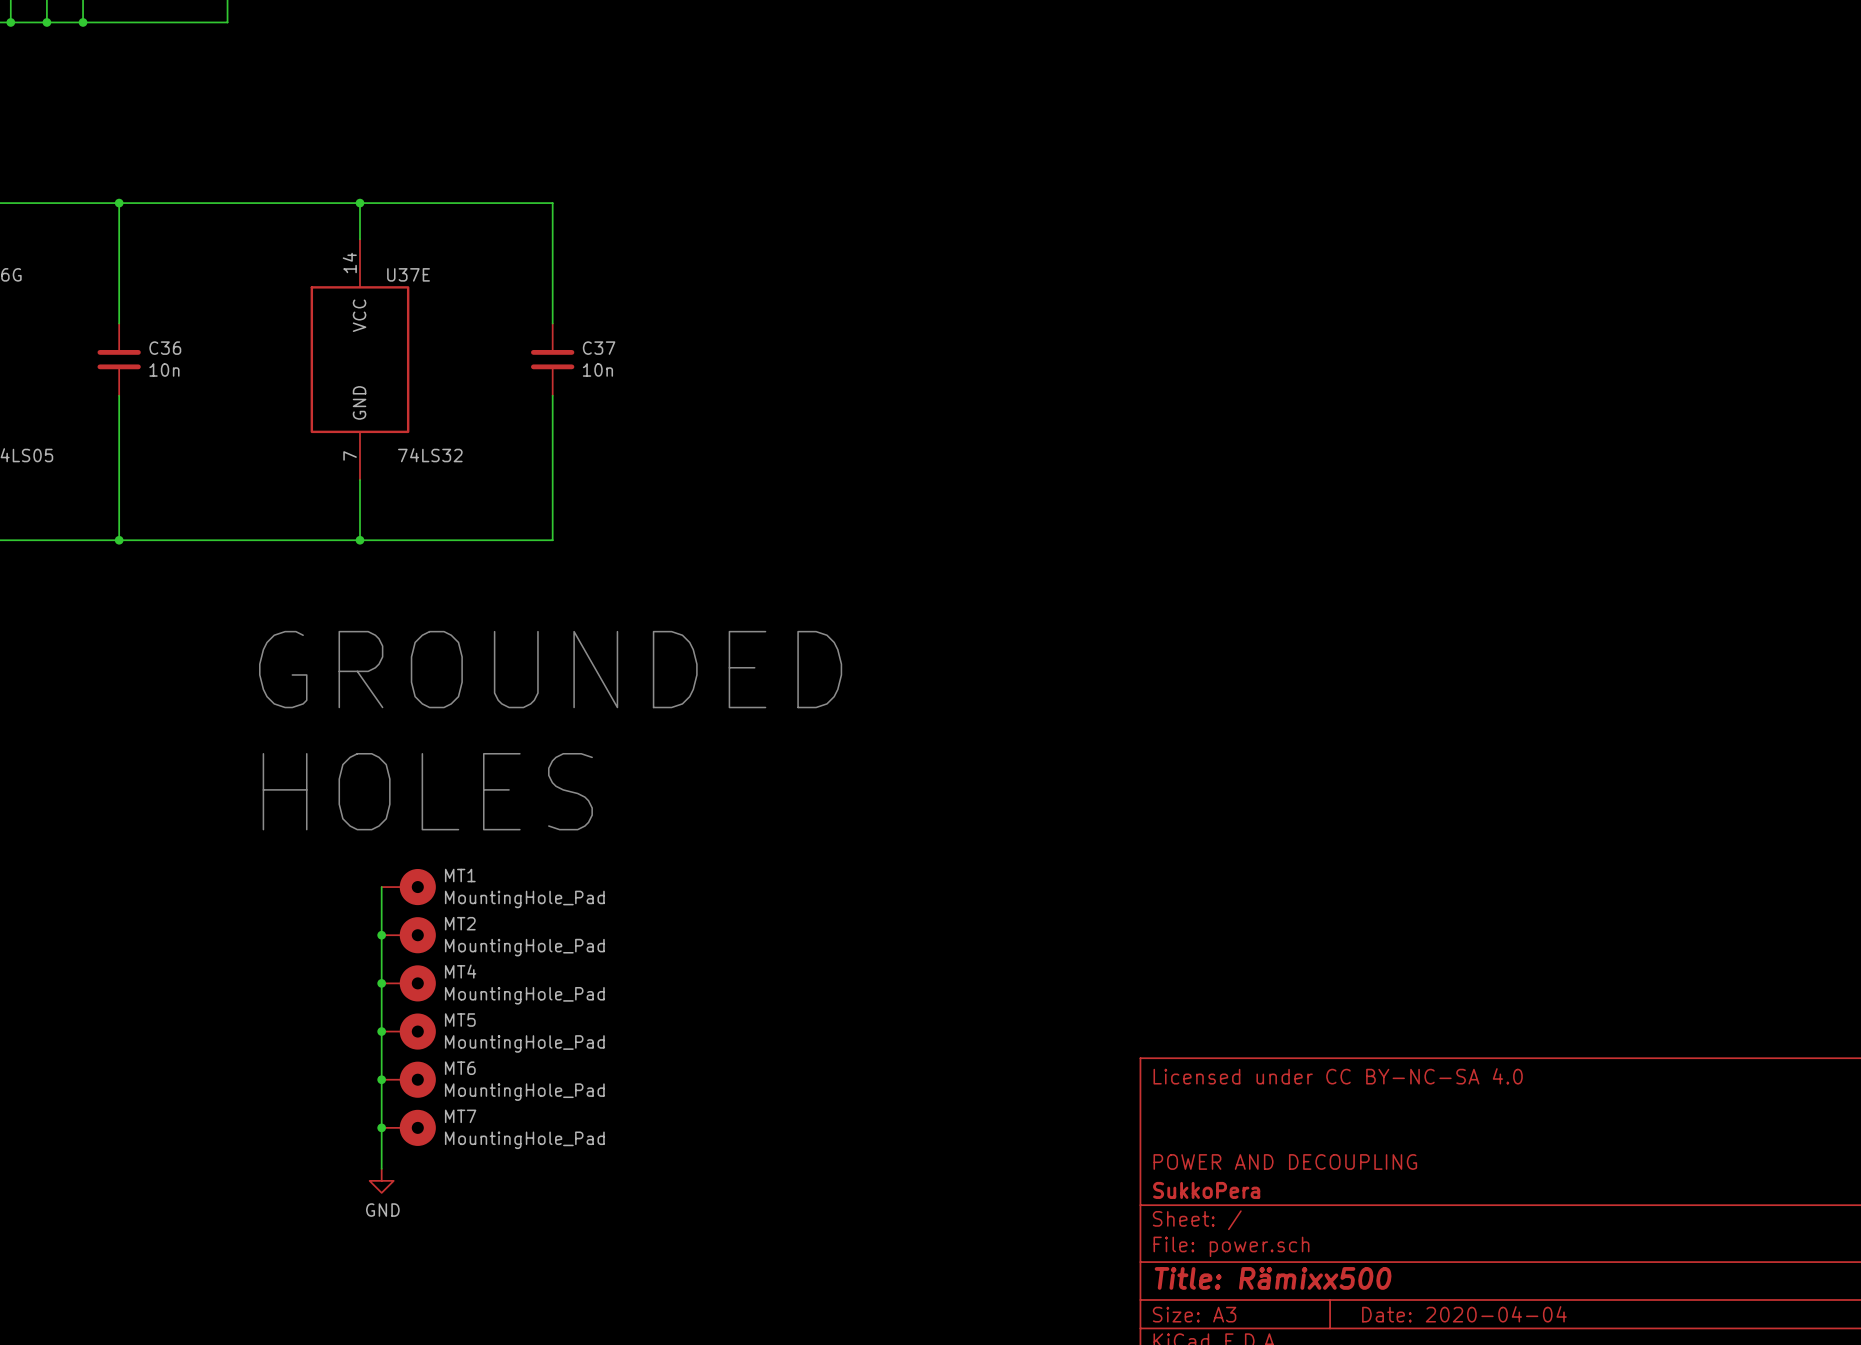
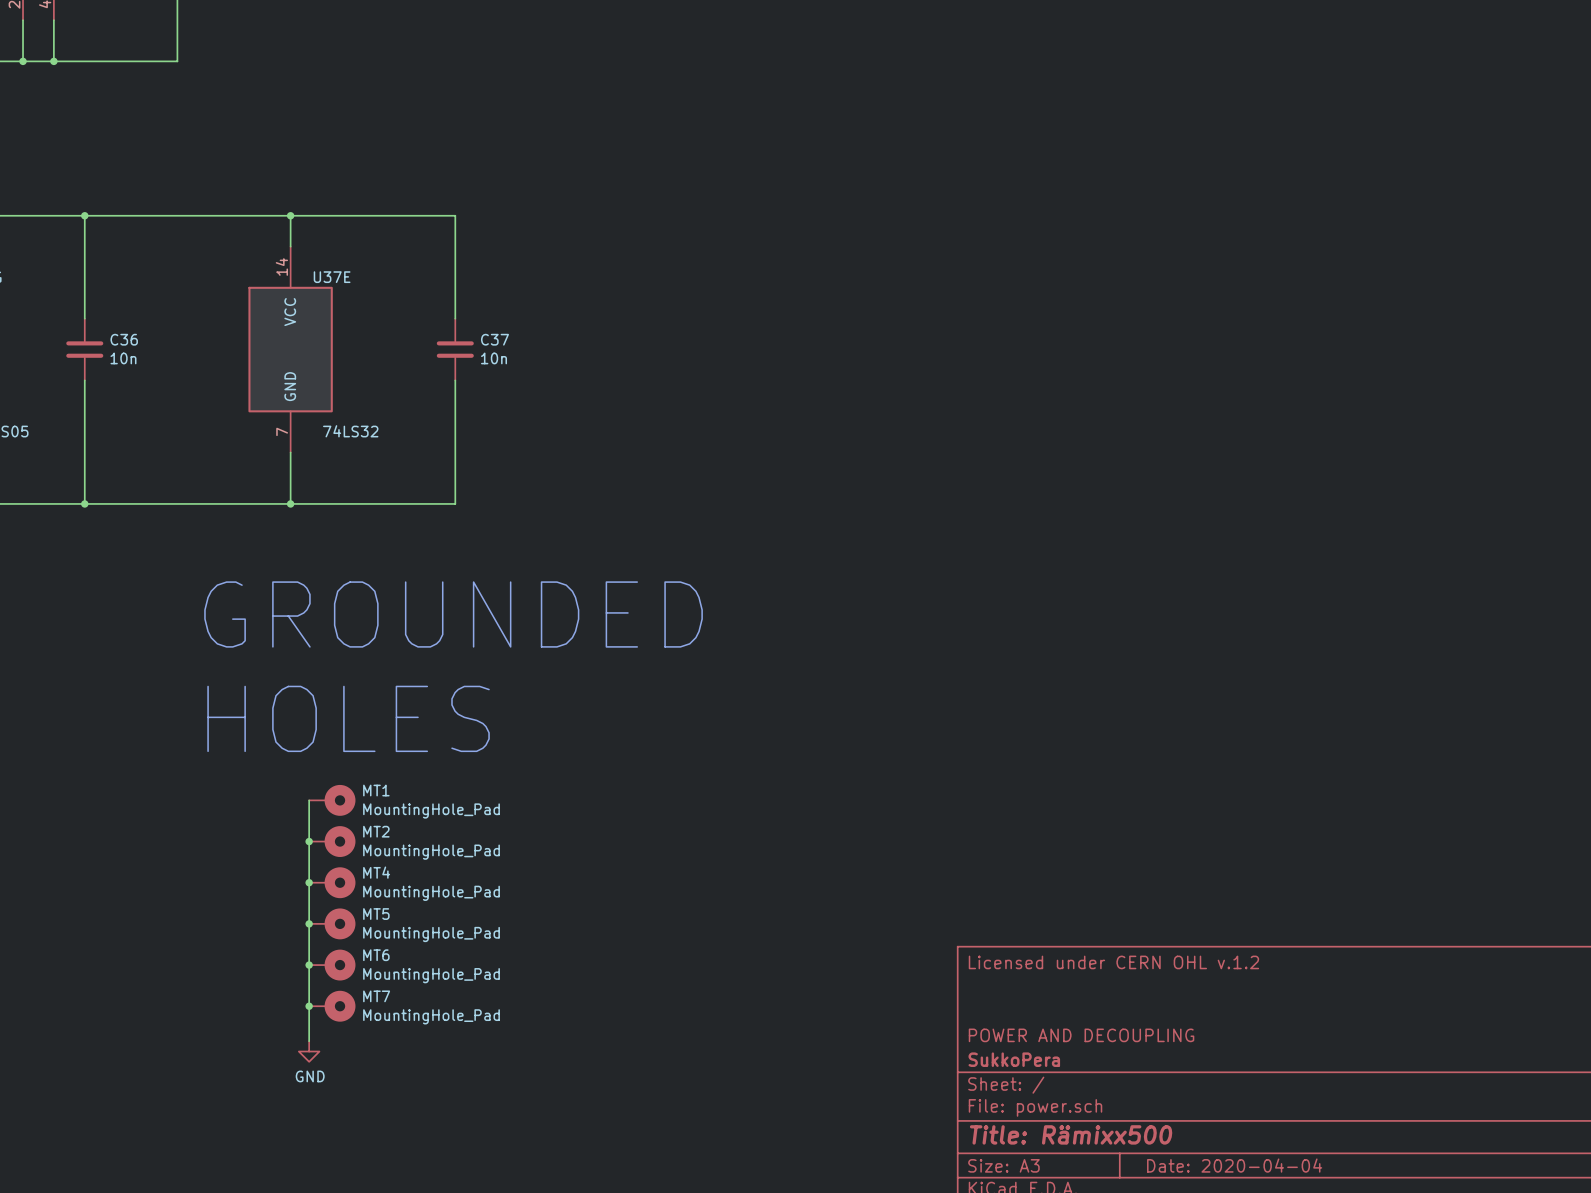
title block: Licensed under CC BY-NC-SA 4.0 (1338, 1076) -> Licensed under CERN OHL v.1.2 (1113, 962)

